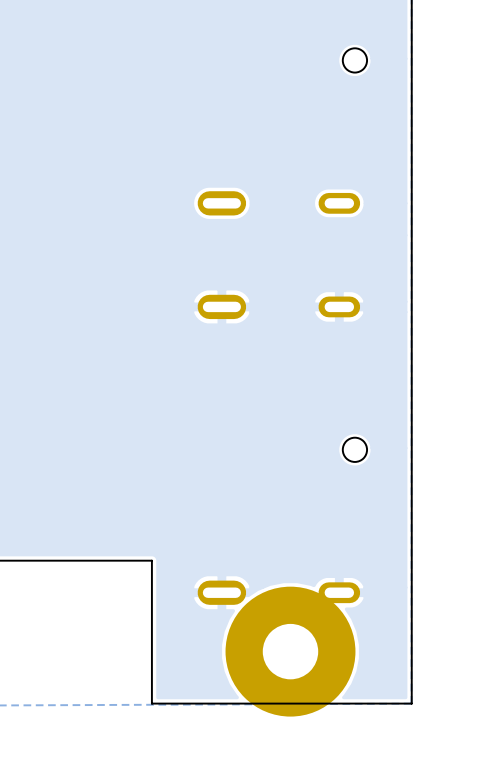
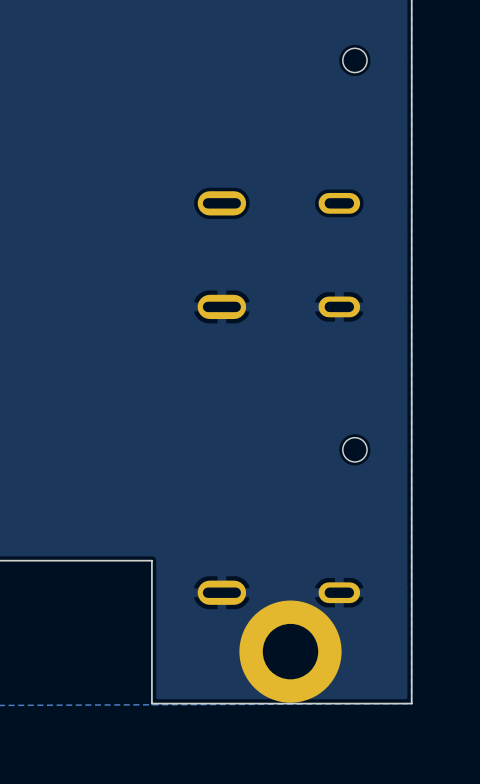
part footprint: [225, 586, 356, 717] -> [239, 600, 342, 703]

